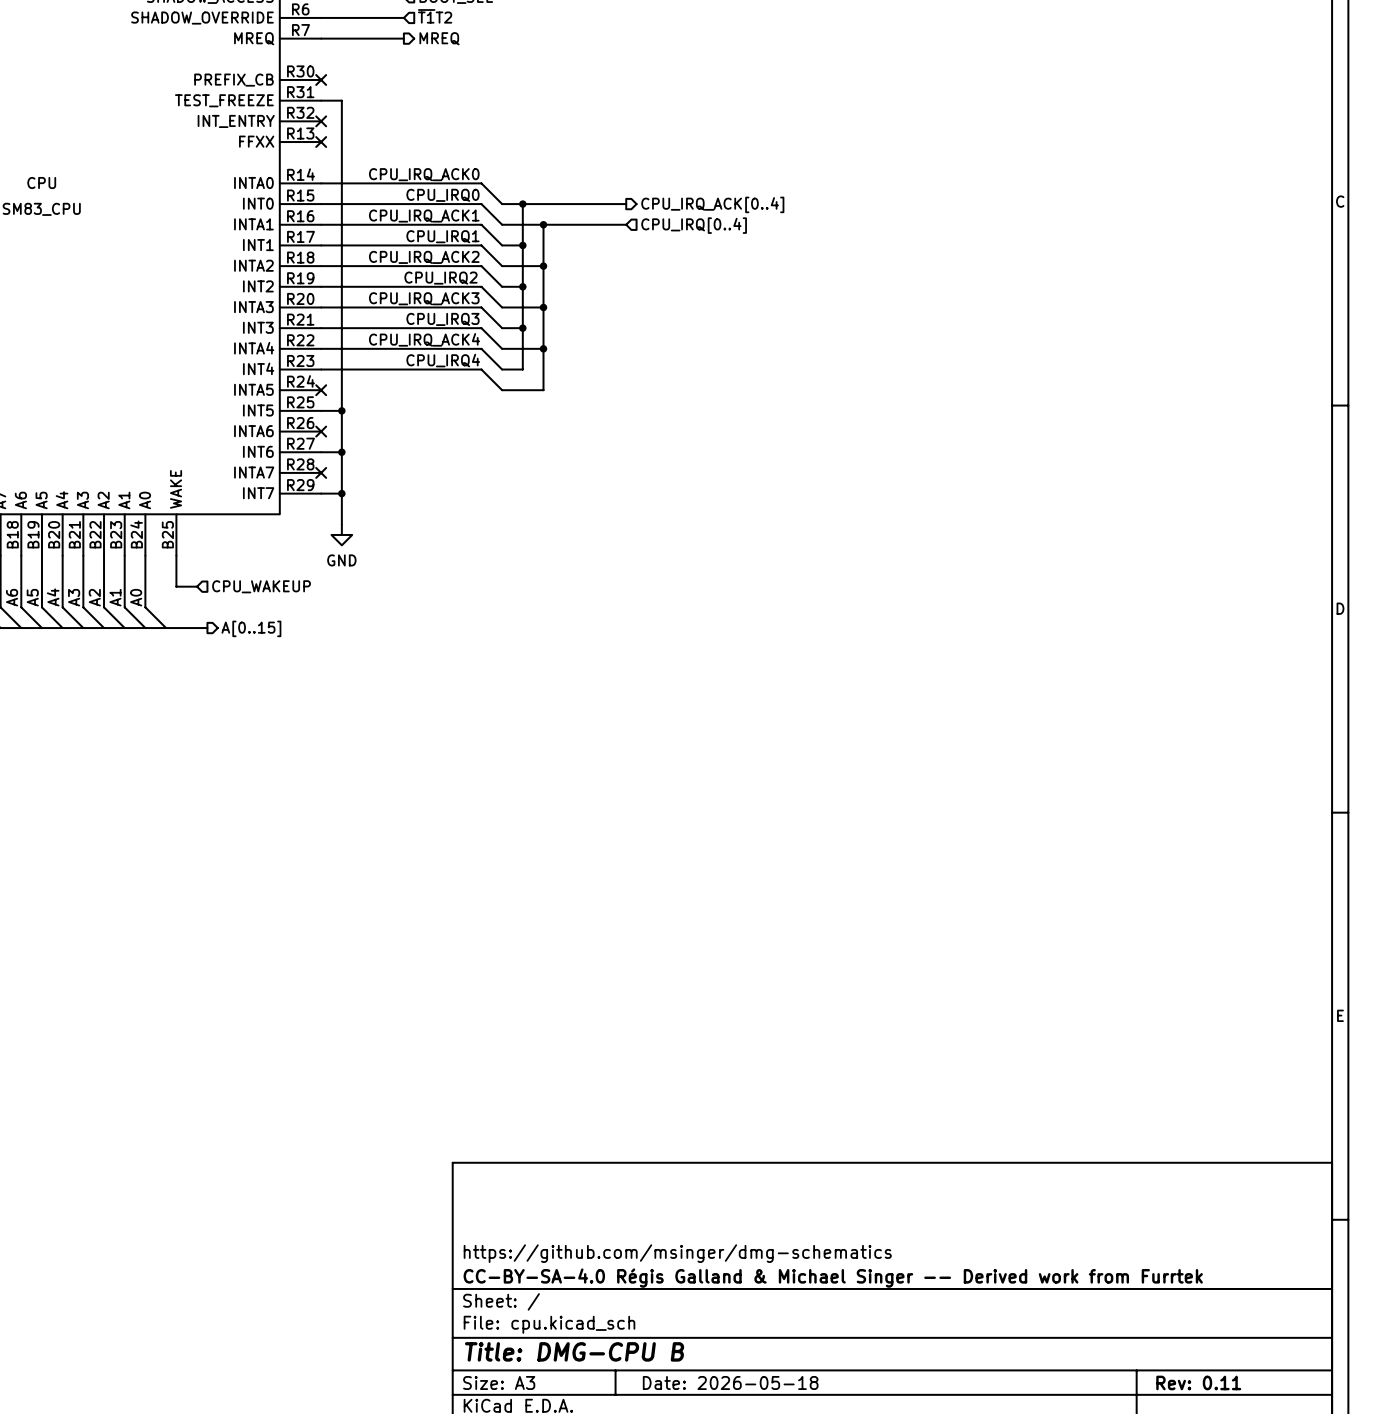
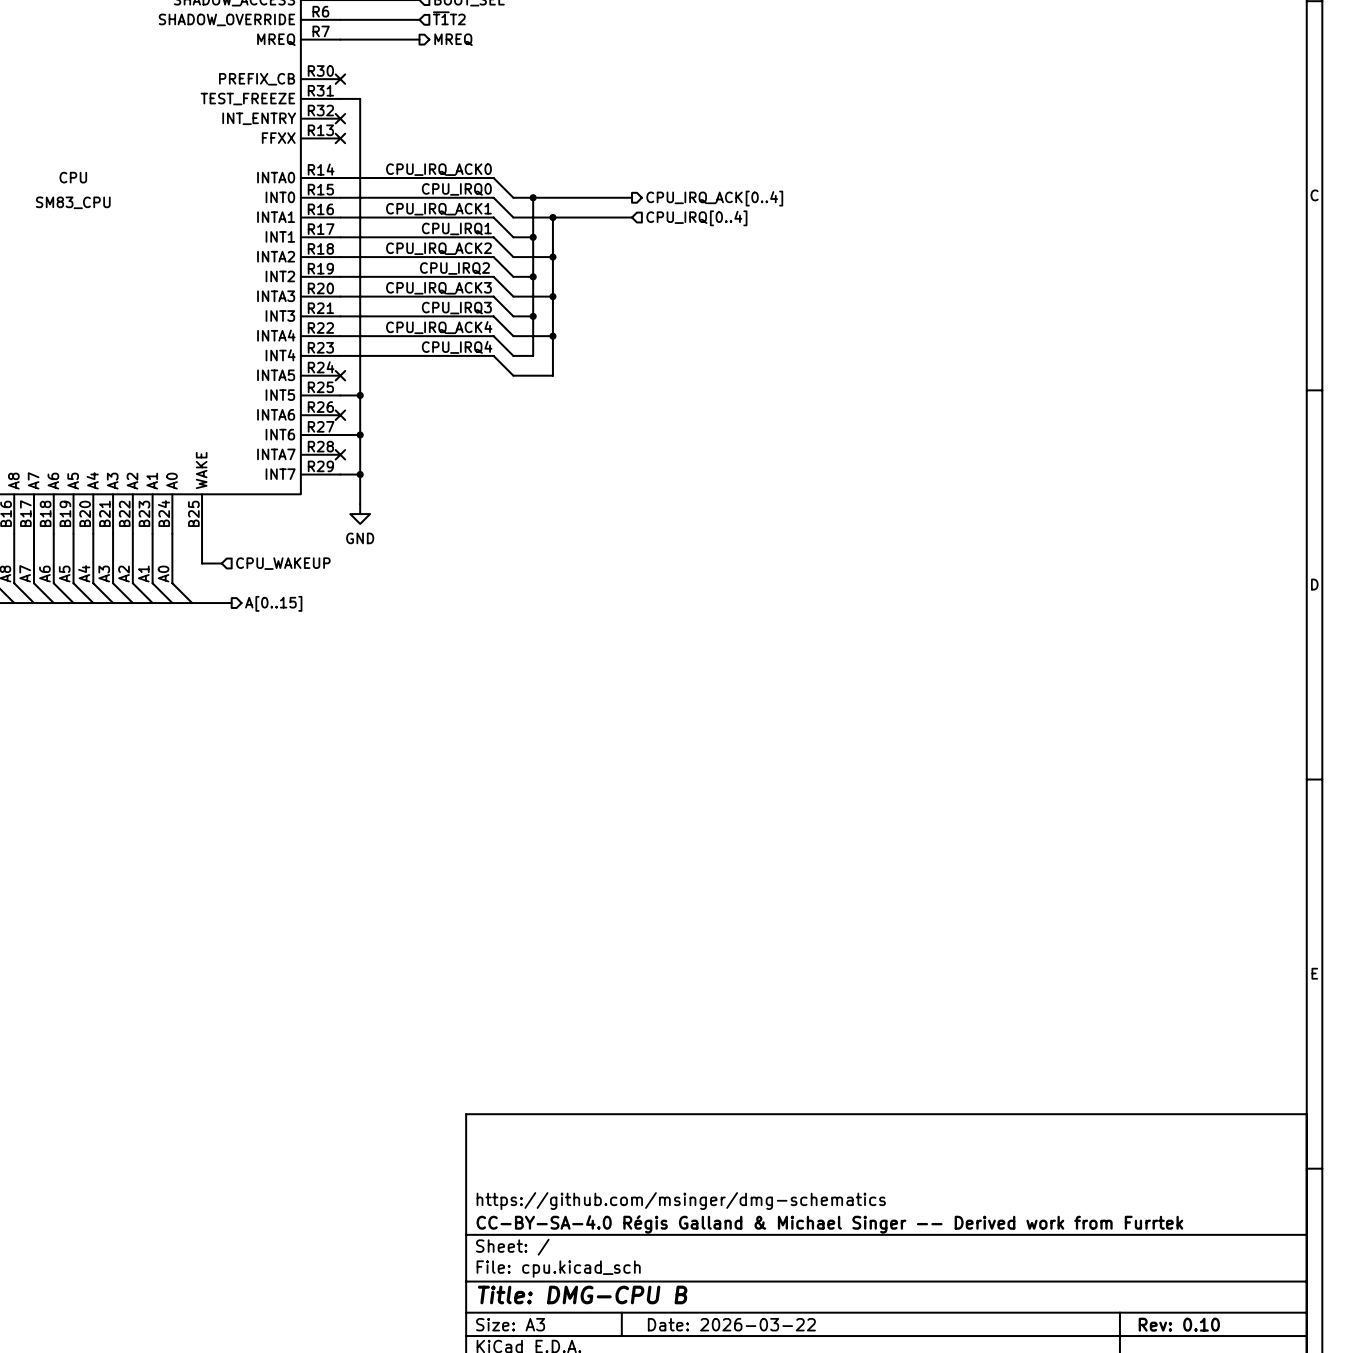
title block: Date: 2026-05-18 (730, 1382) -> Date: 2026-03-22 (731, 1324)
title block: Rev: 0.11 (1198, 1382) -> Rev: 0.10 (1179, 1324)

